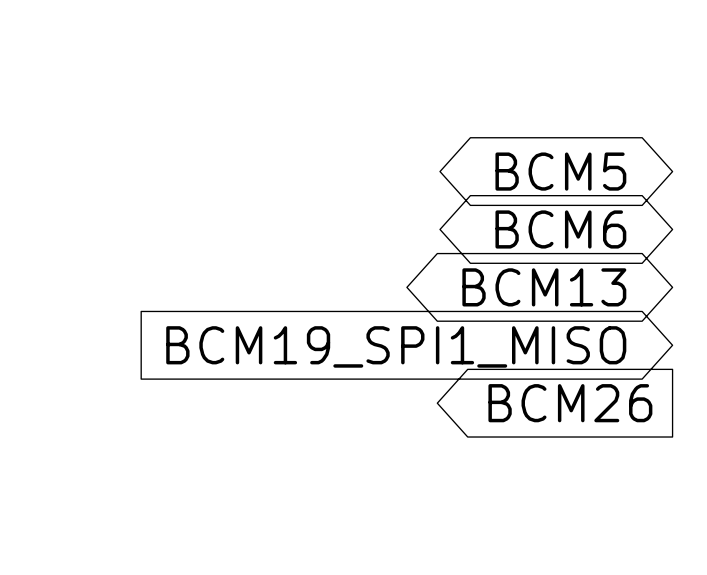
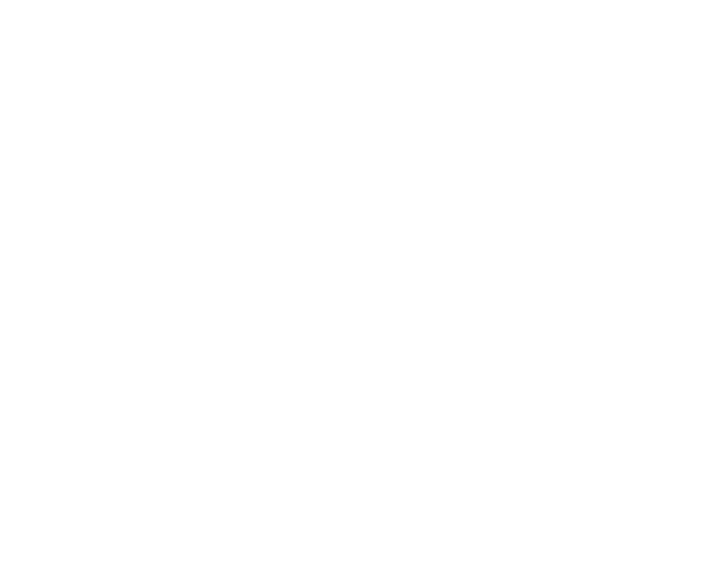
global label: BCM5 (560, 171) -> none
global label: BCM6 (560, 229) -> none
global label: BCM13 (544, 287) -> none
global label: BCM19_SPI1_MISO (396, 346) -> none
global label: BCM26 (570, 403) -> none

